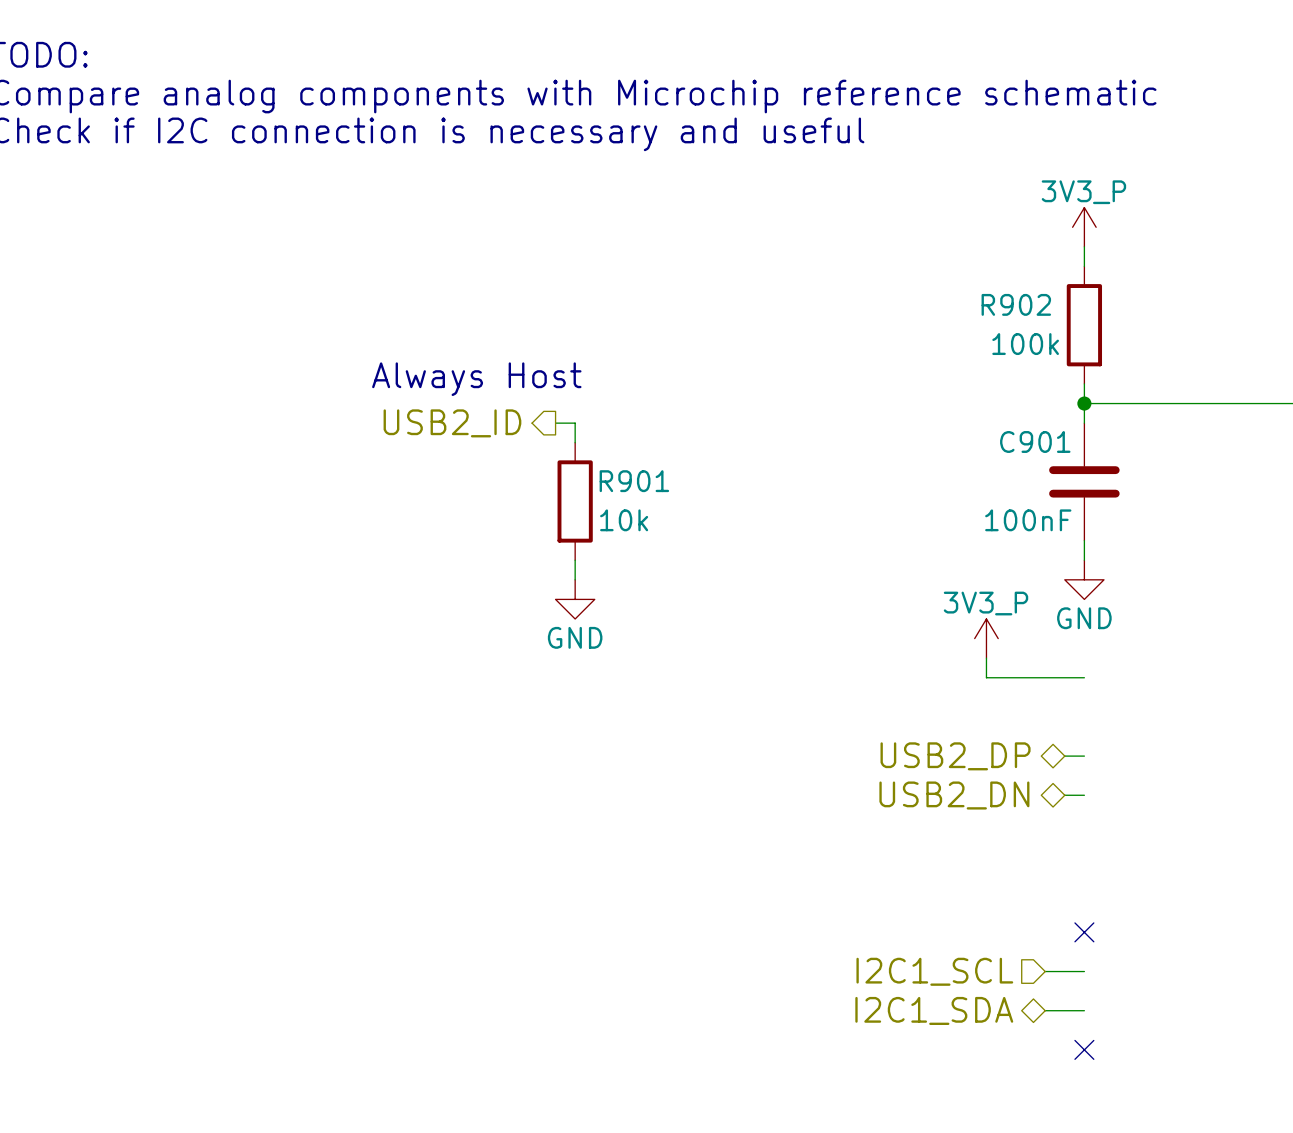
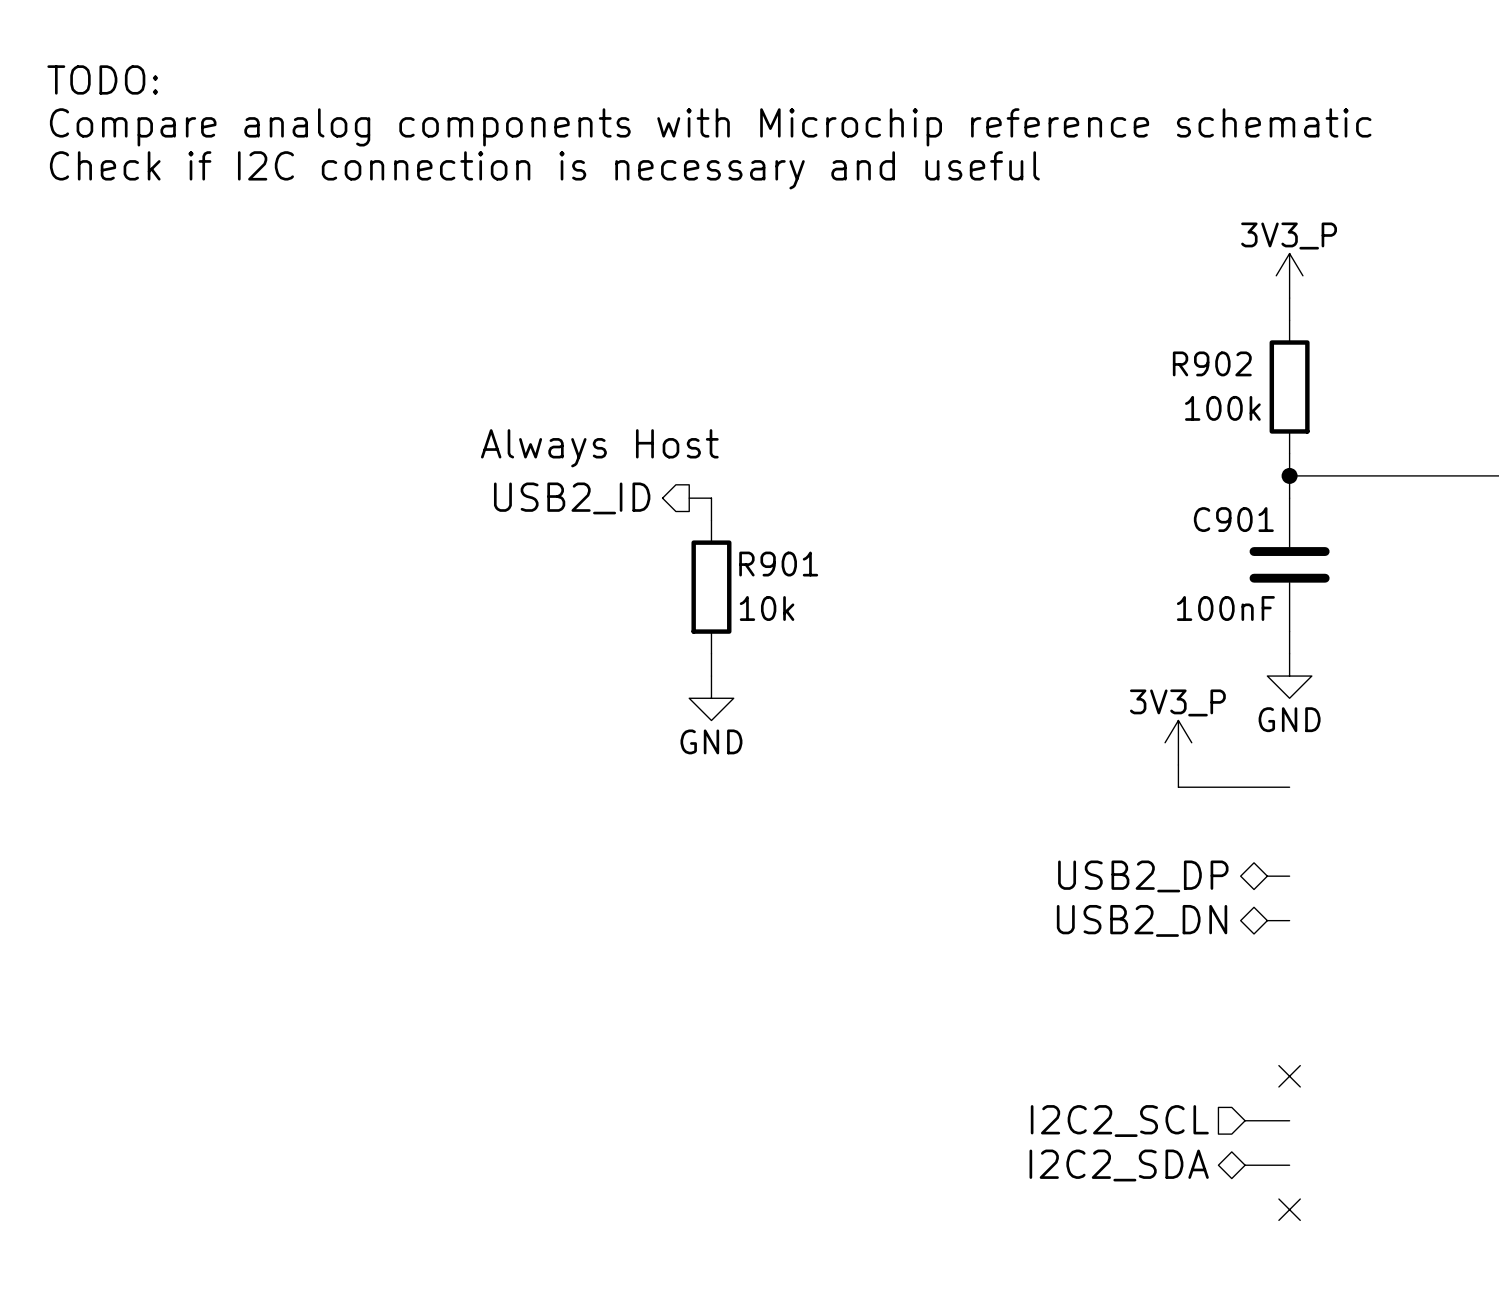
hierarchical label: I2C1_SCL (934, 971) -> I2C2_SCL (1119, 1121)
hierarchical label: I2C1_SDA (934, 1010) -> I2C2_SDA (1119, 1165)

